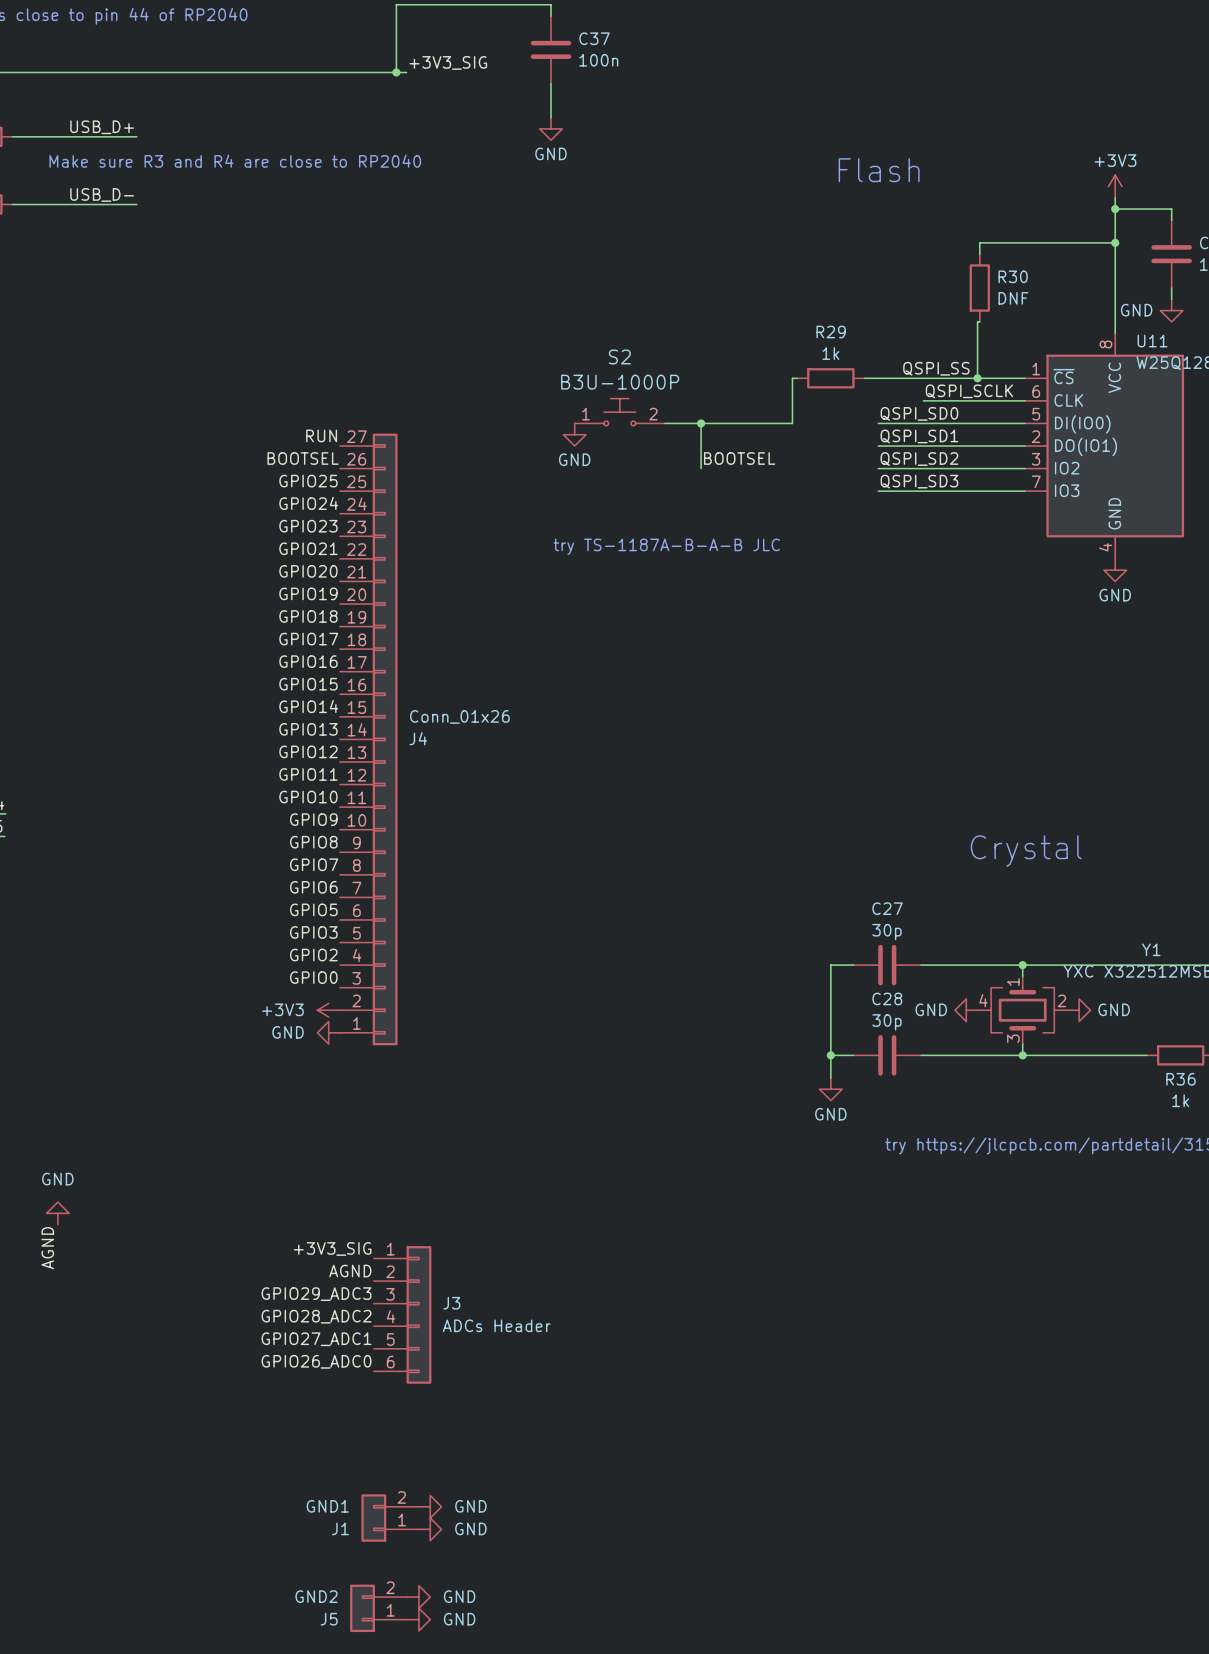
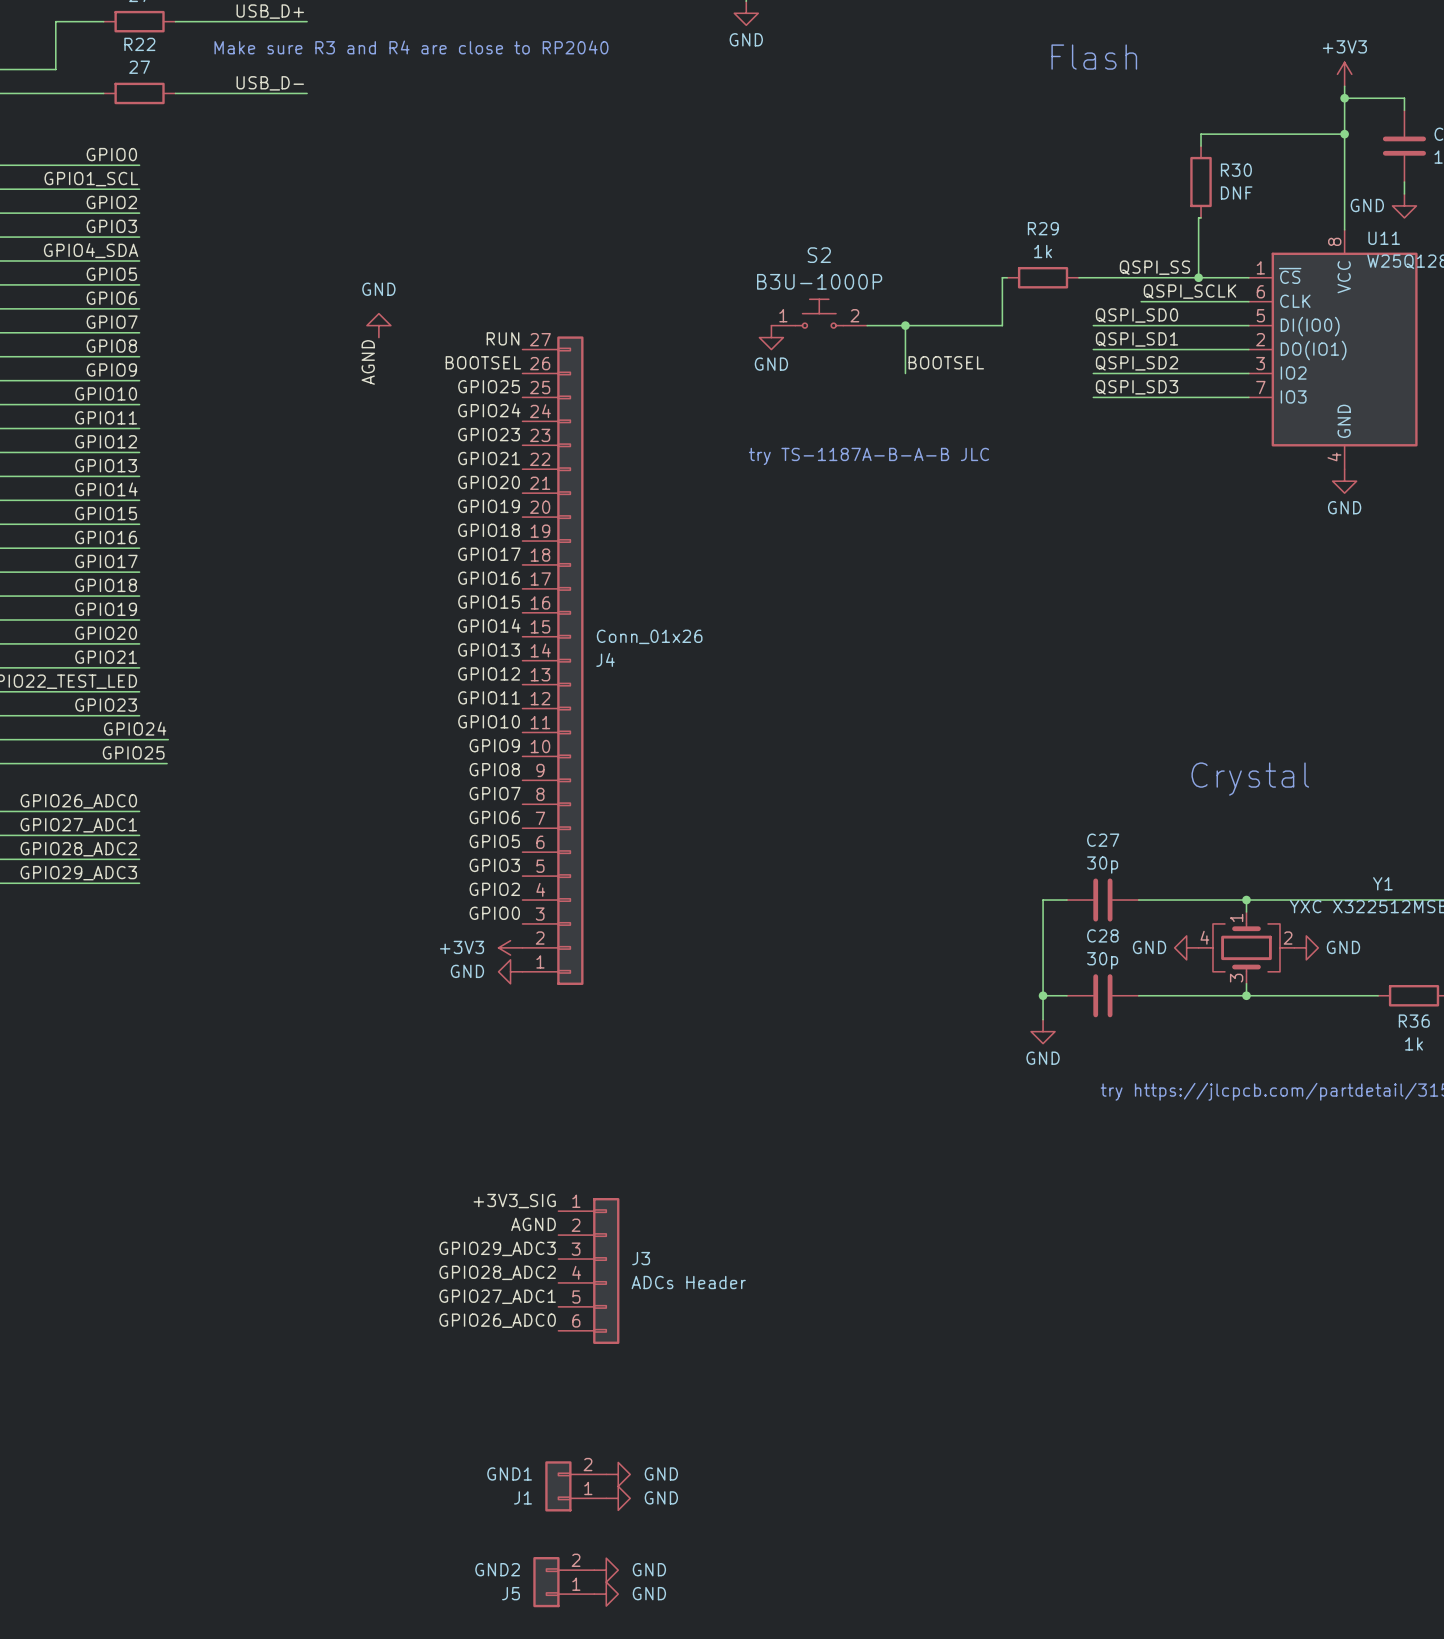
power symbol: none -> GND (378, 325)
label: none -> AGND (368, 362)
power symbol: GND (57, 1213) -> none
label: AGND (47, 1248) -> none

